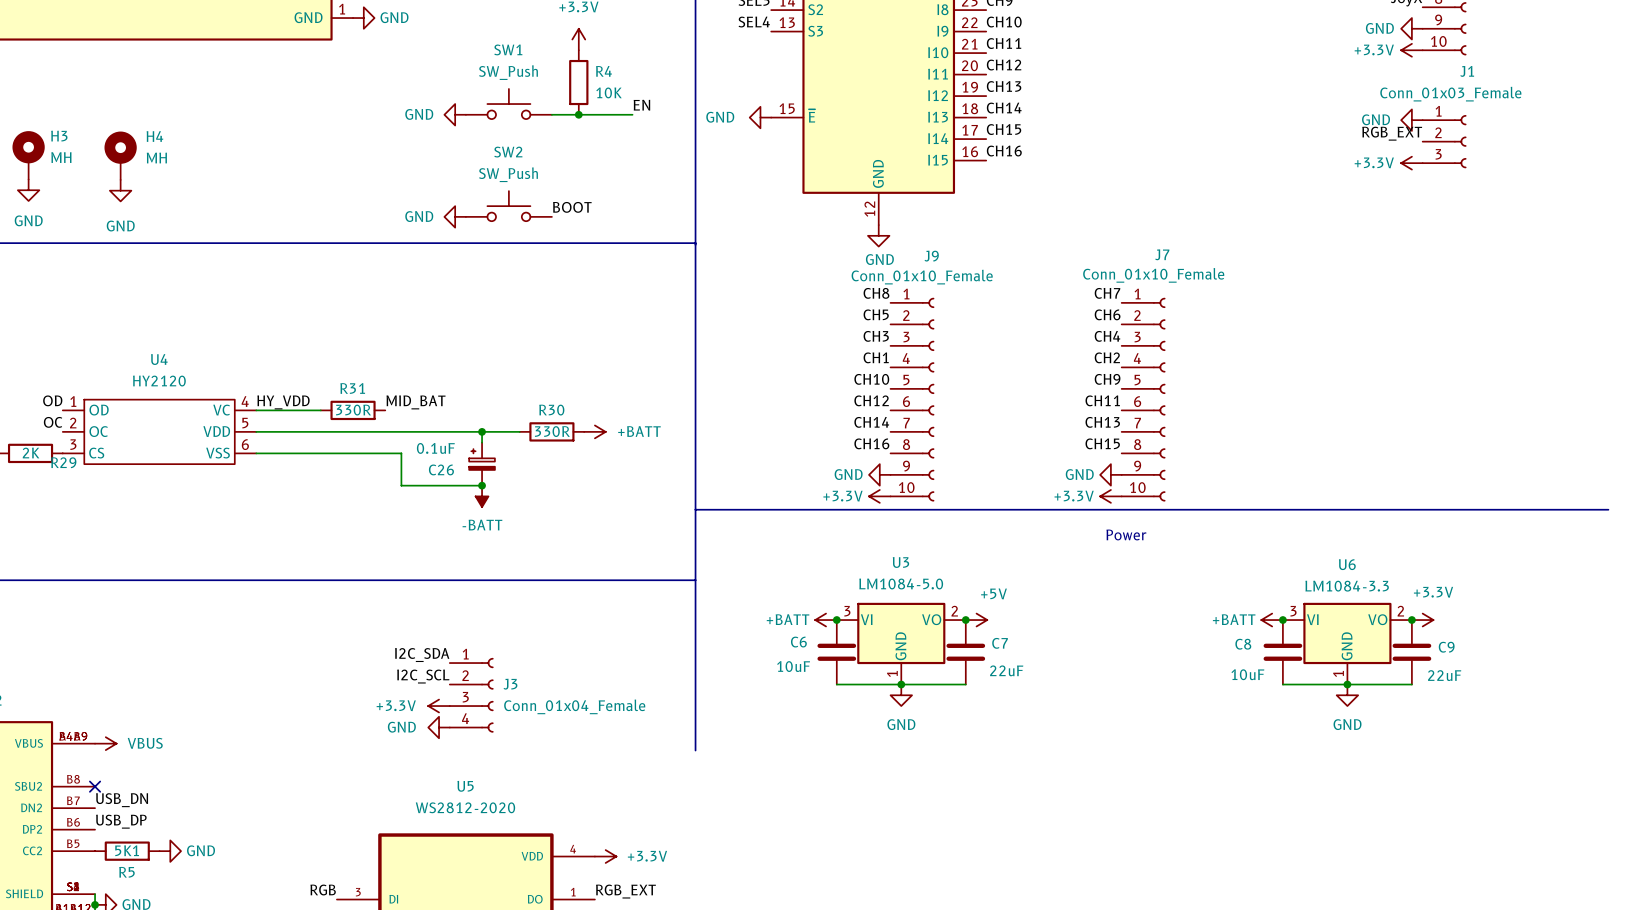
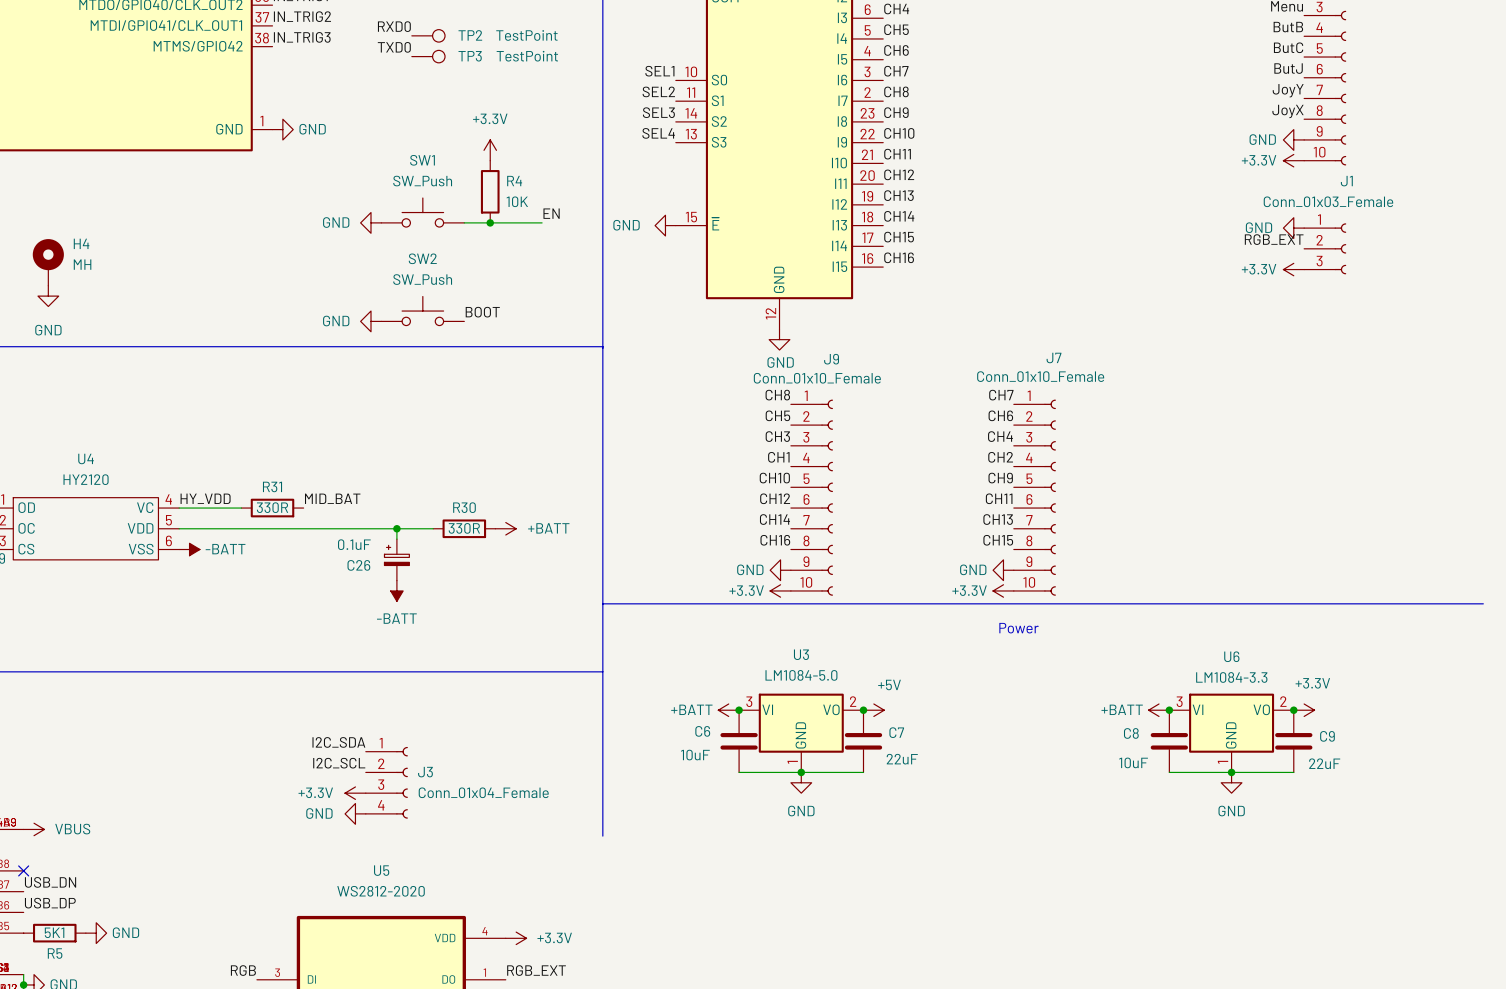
wire: (256, 453) (401, 453) (401, 485) (482, 485) -> none
power symbol: none -> -BATT (189, 549)
junction: (482, 485) -> none

